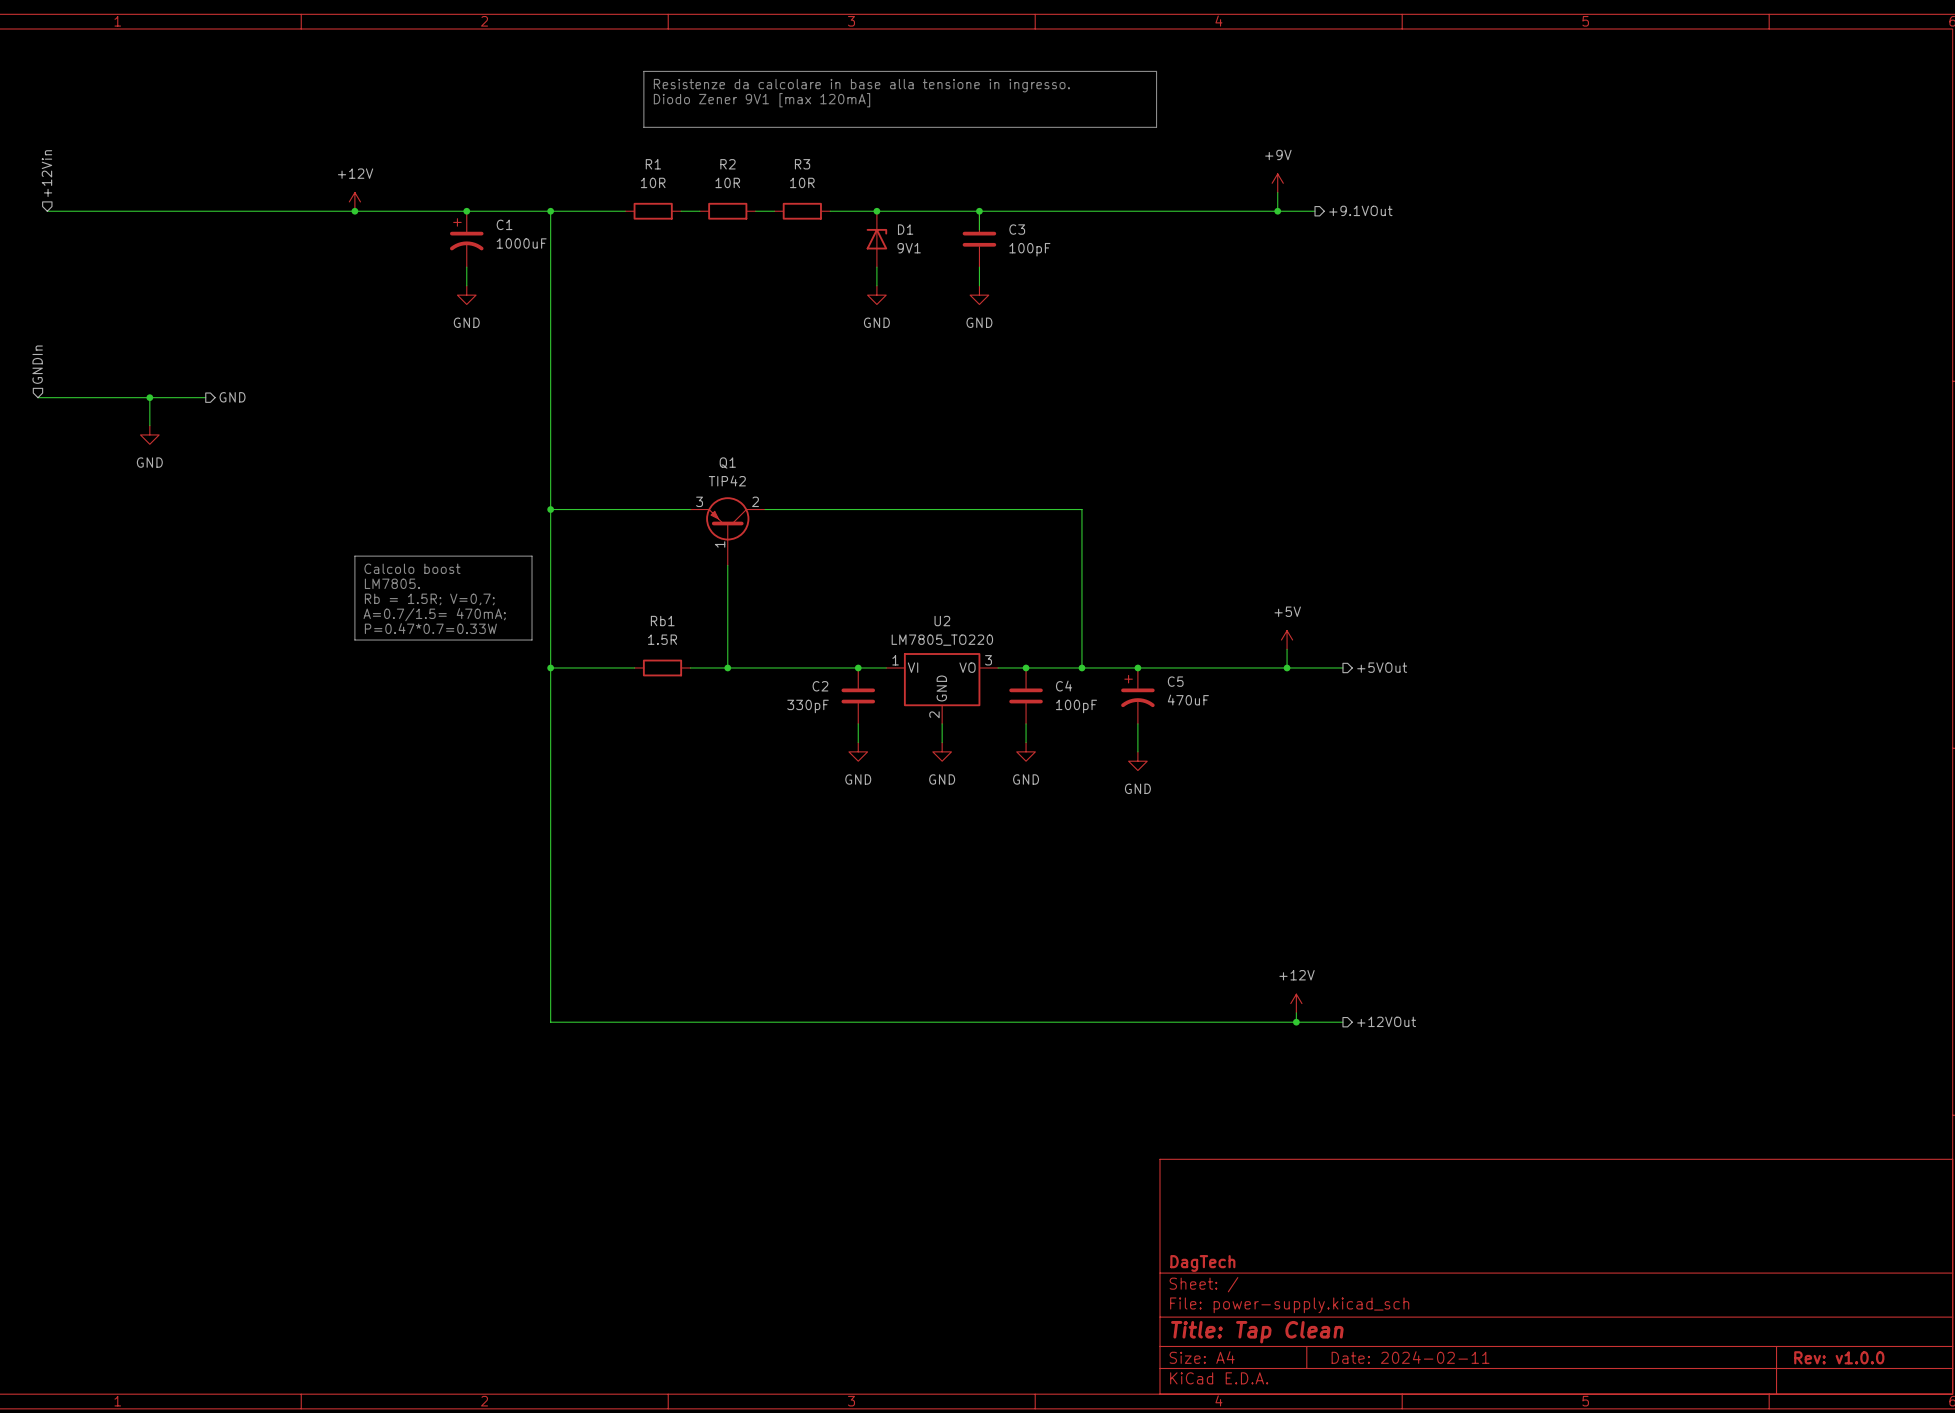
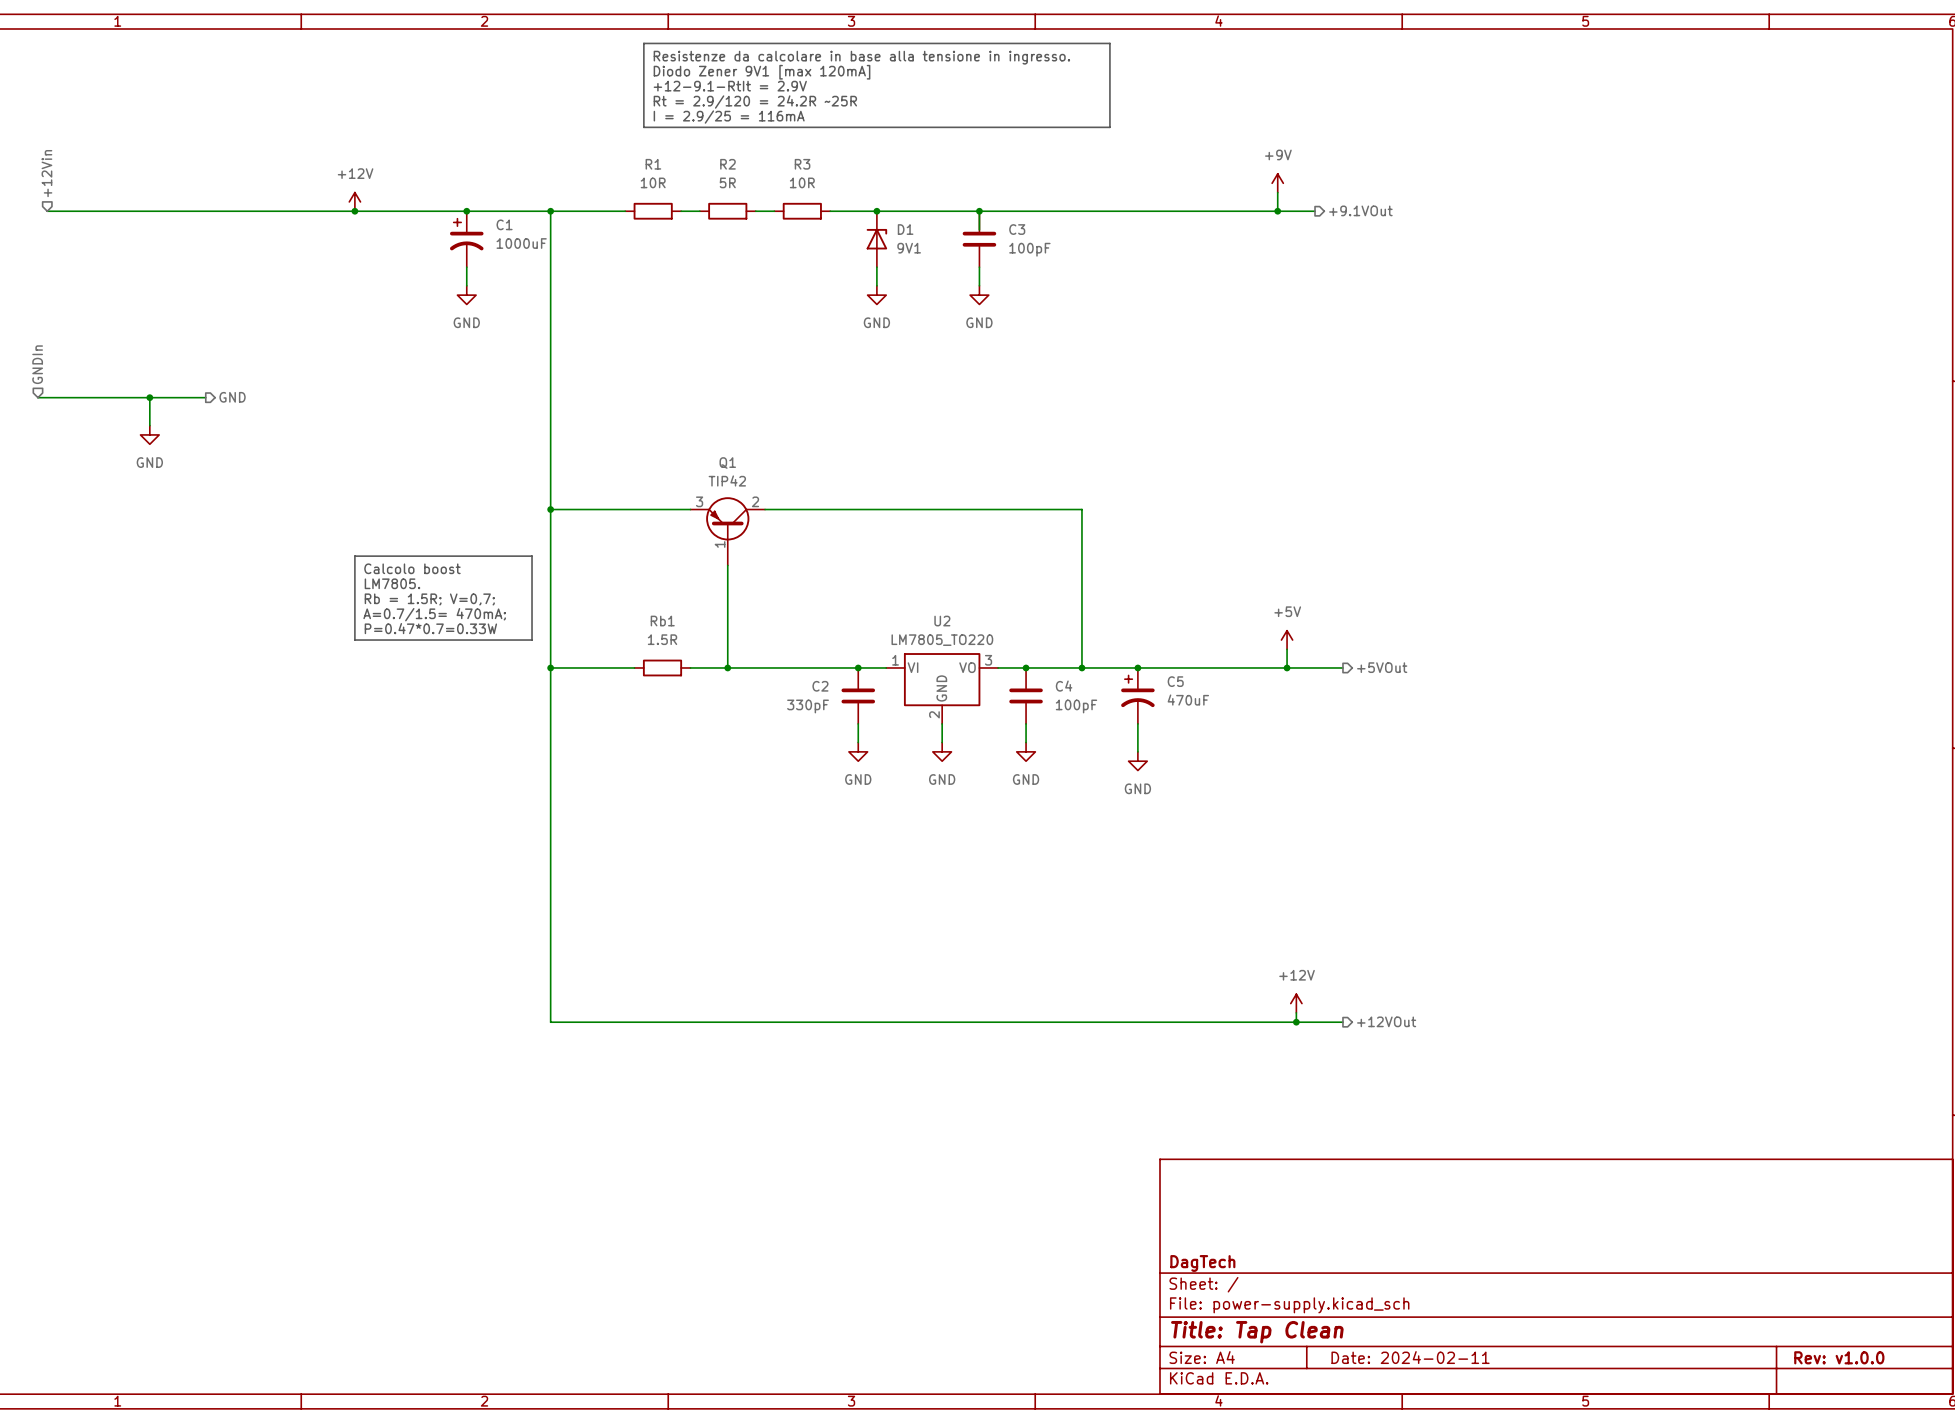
text: none -> Resistenze da calcolare in base alla tensione in ingresso. (861, 57)
line: (643, 71) (1156, 71) (1156, 127) (1109, 127) -> (643, 71) (643, 43) (1109, 43) (1109, 127)
text: none -> Diodo Zener 9V1 [max 120mA] (762, 72)
text: Resistenze da calcolare in base alla tensione in ingresso. (861, 85) -> +12-9.1-RtIt = 2.9V (730, 86)
text: Diodo Zener 9V1 [max 120mA] (762, 100) -> Rt = 2.9/120 = 24.2R ~25R (755, 102)
text: none -> I = 2.9/25 = 116mA (729, 117)
R2 value: 10R (727, 182) -> 5R (727, 182)

